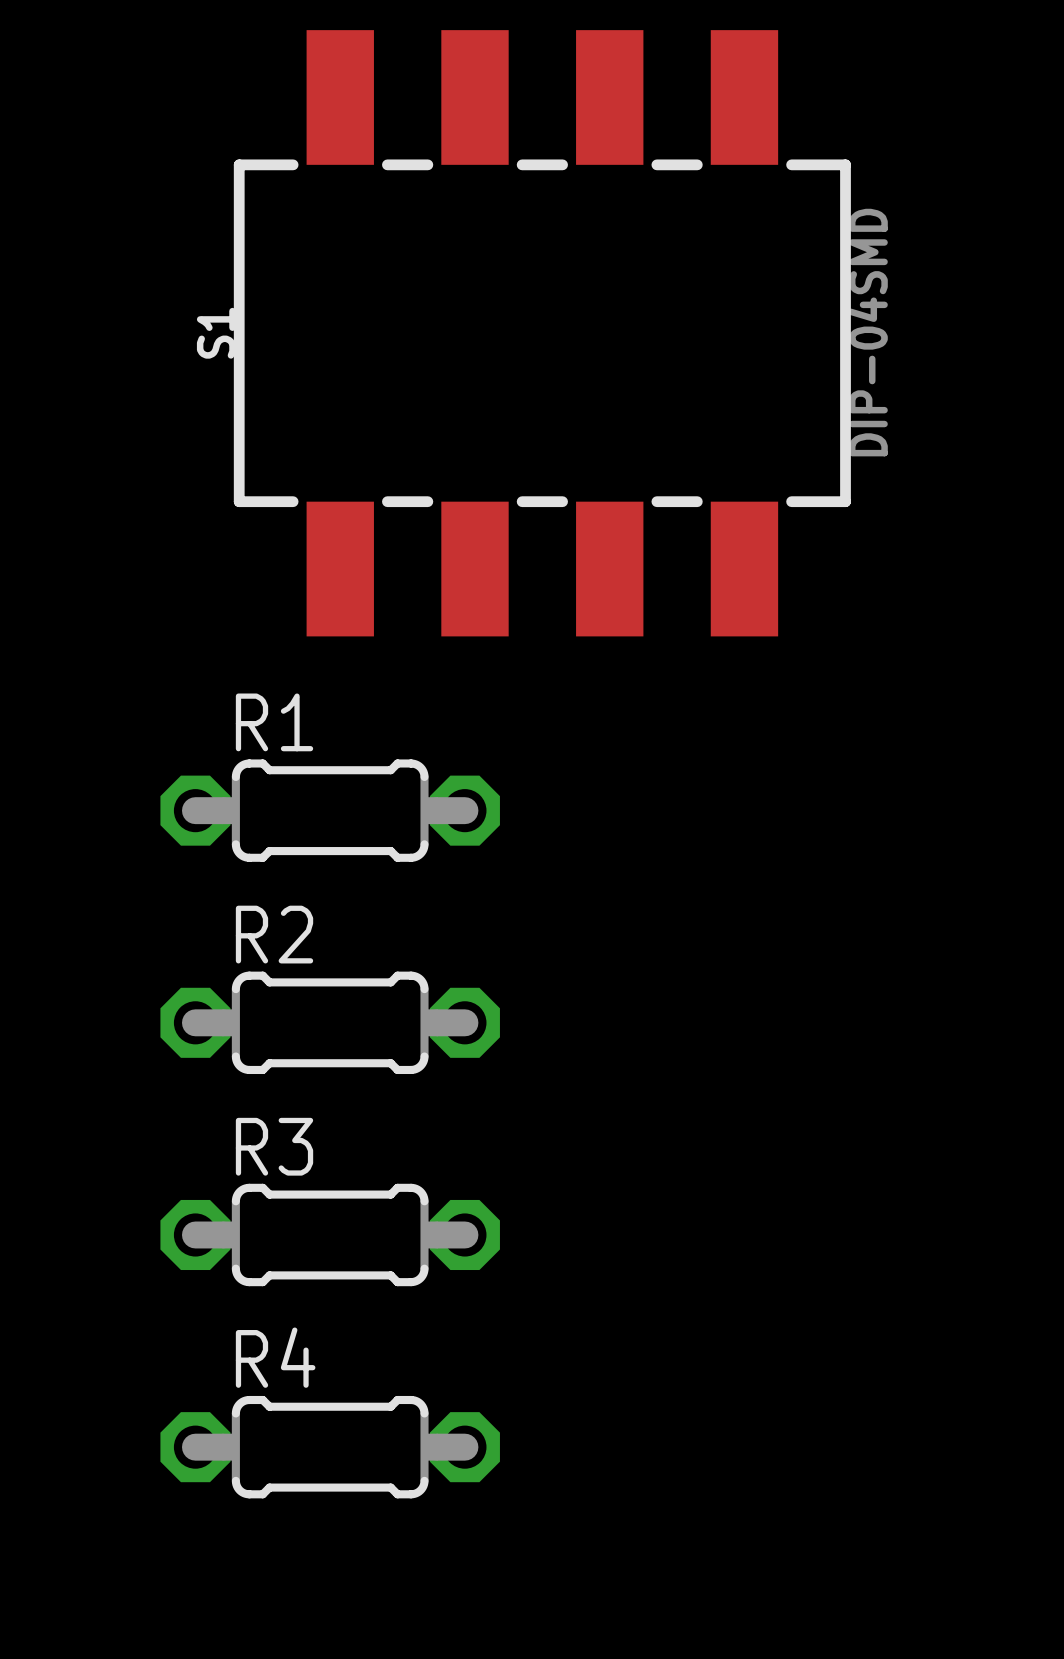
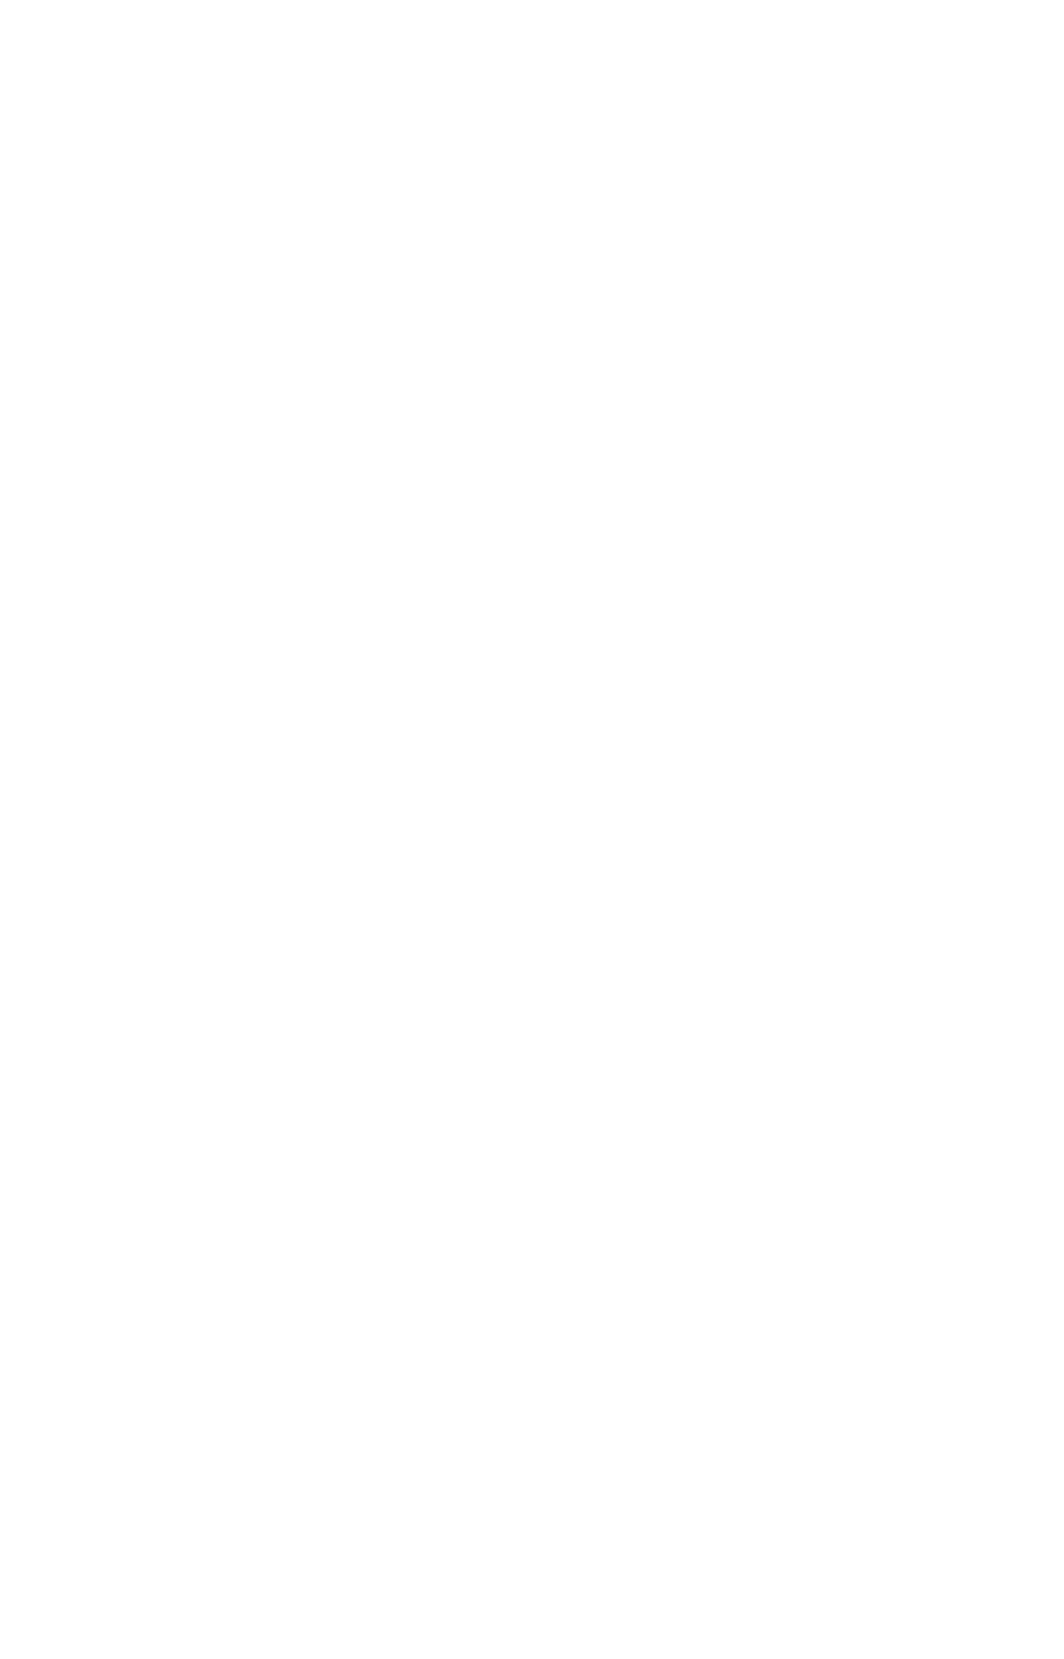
S1: DIP-04SMD (542, 333) -> none
R1: (330, 810) -> none
R2: (330, 1022) -> none
R3: (330, 1234) -> none
R4: (330, 1447) -> none

